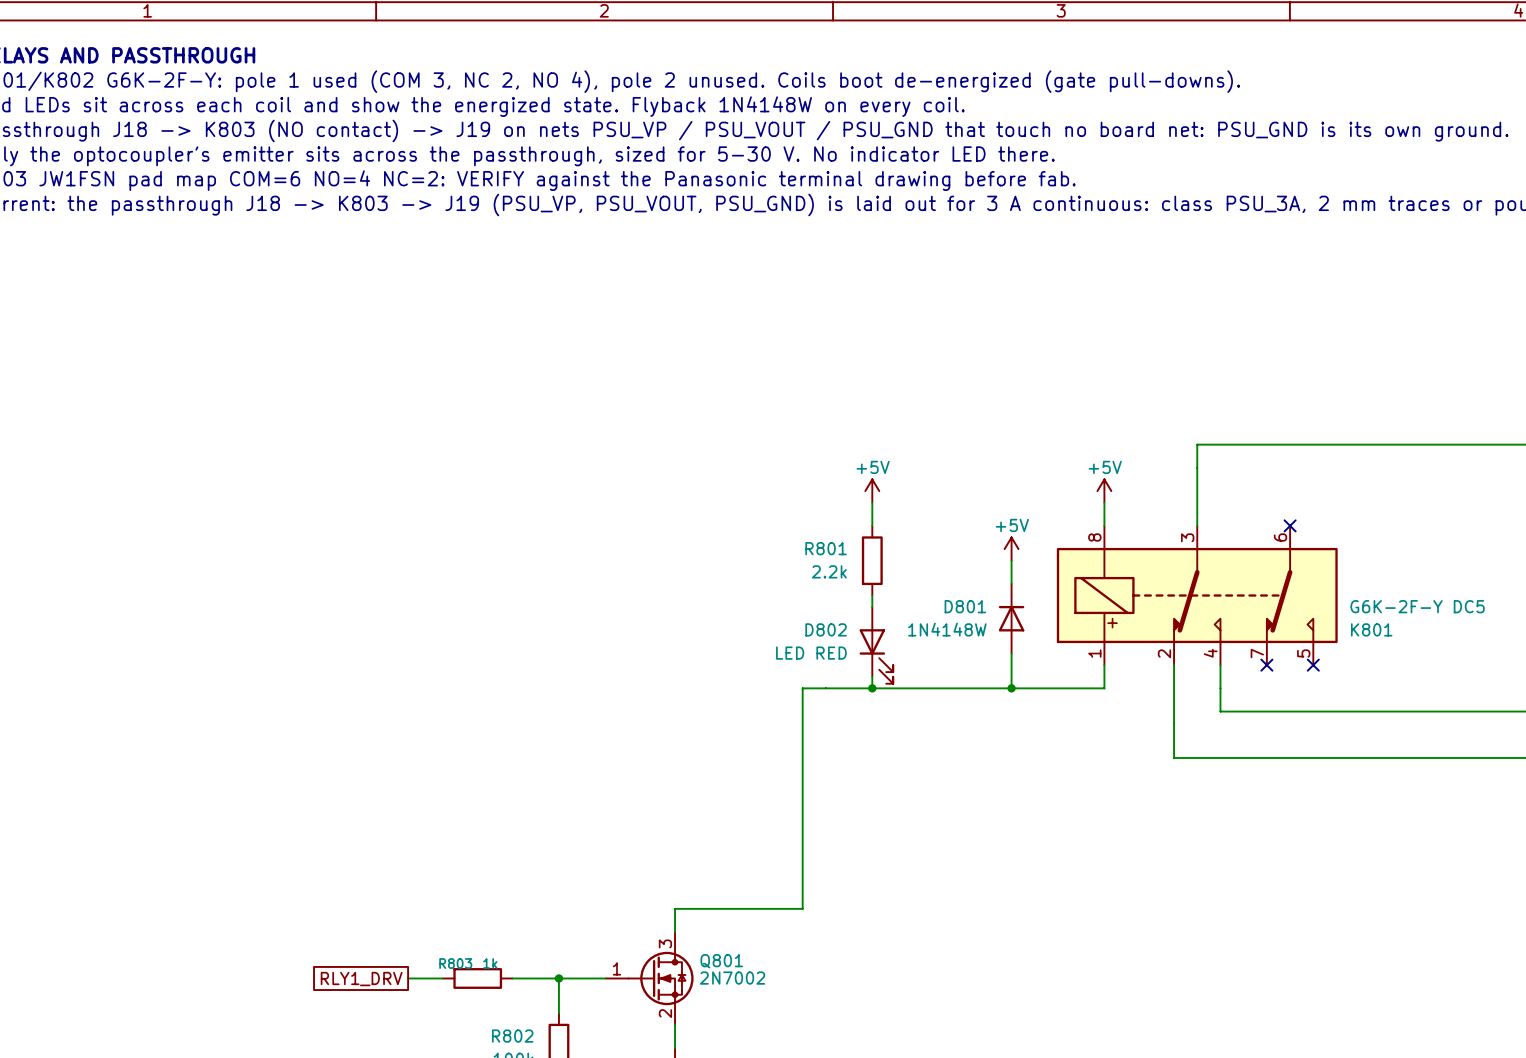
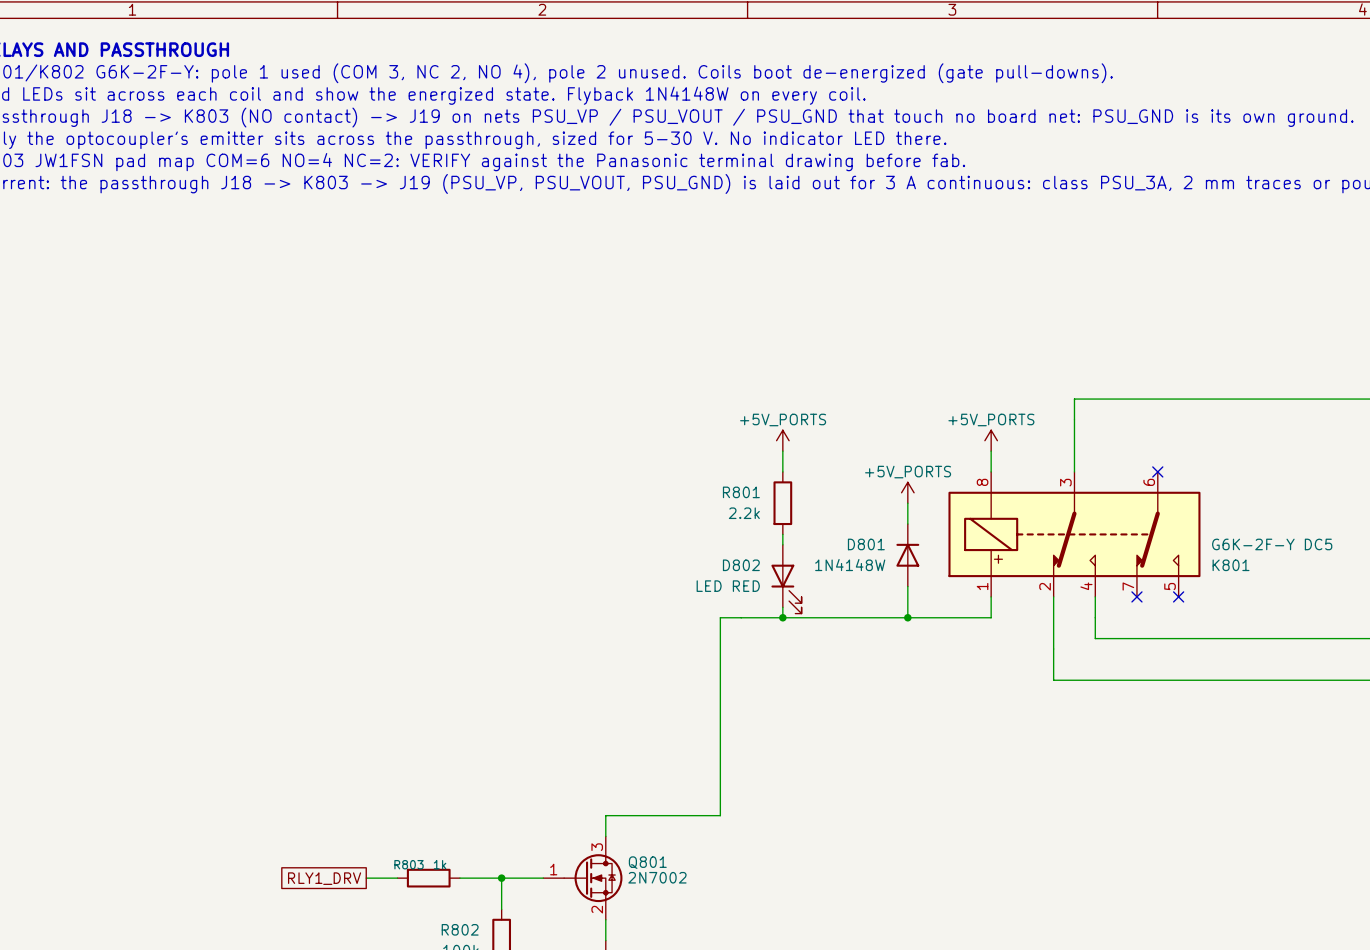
power symbol: +5V (872, 491) -> +5V_PORTS (782, 440)
power symbol: +5V (1104, 491) -> +5V_PORTS (991, 440)
power symbol: +5V (1011, 549) -> +5V_PORTS (907, 492)

